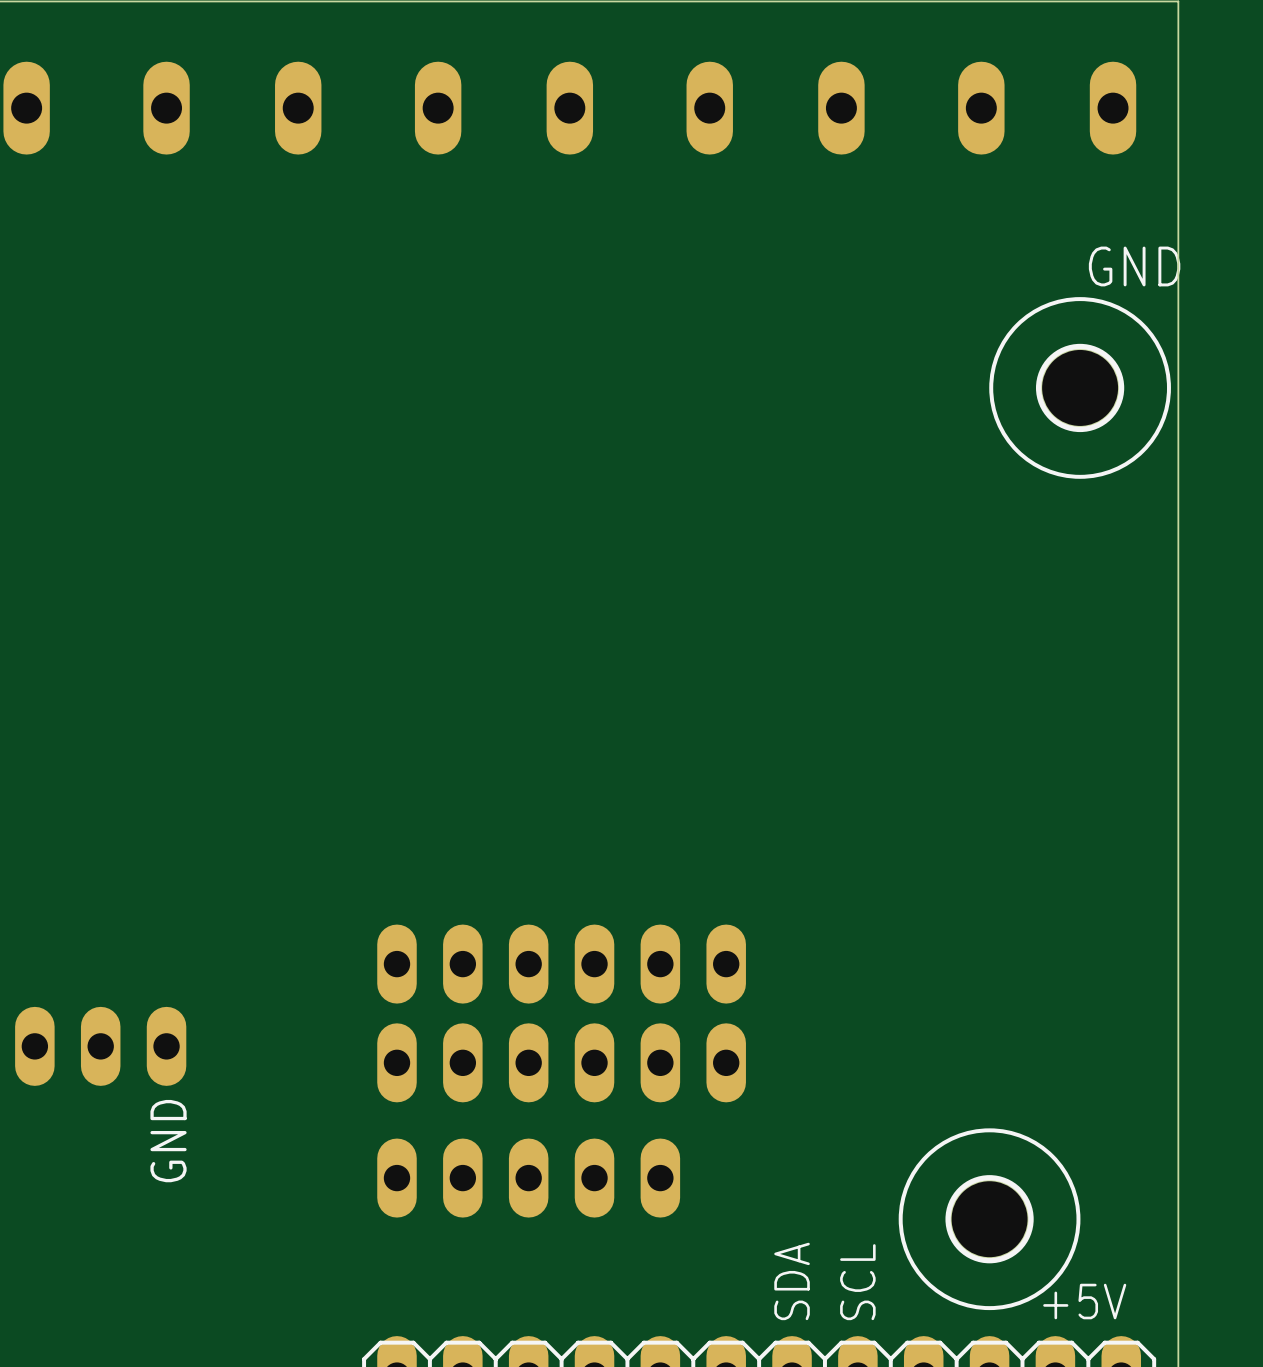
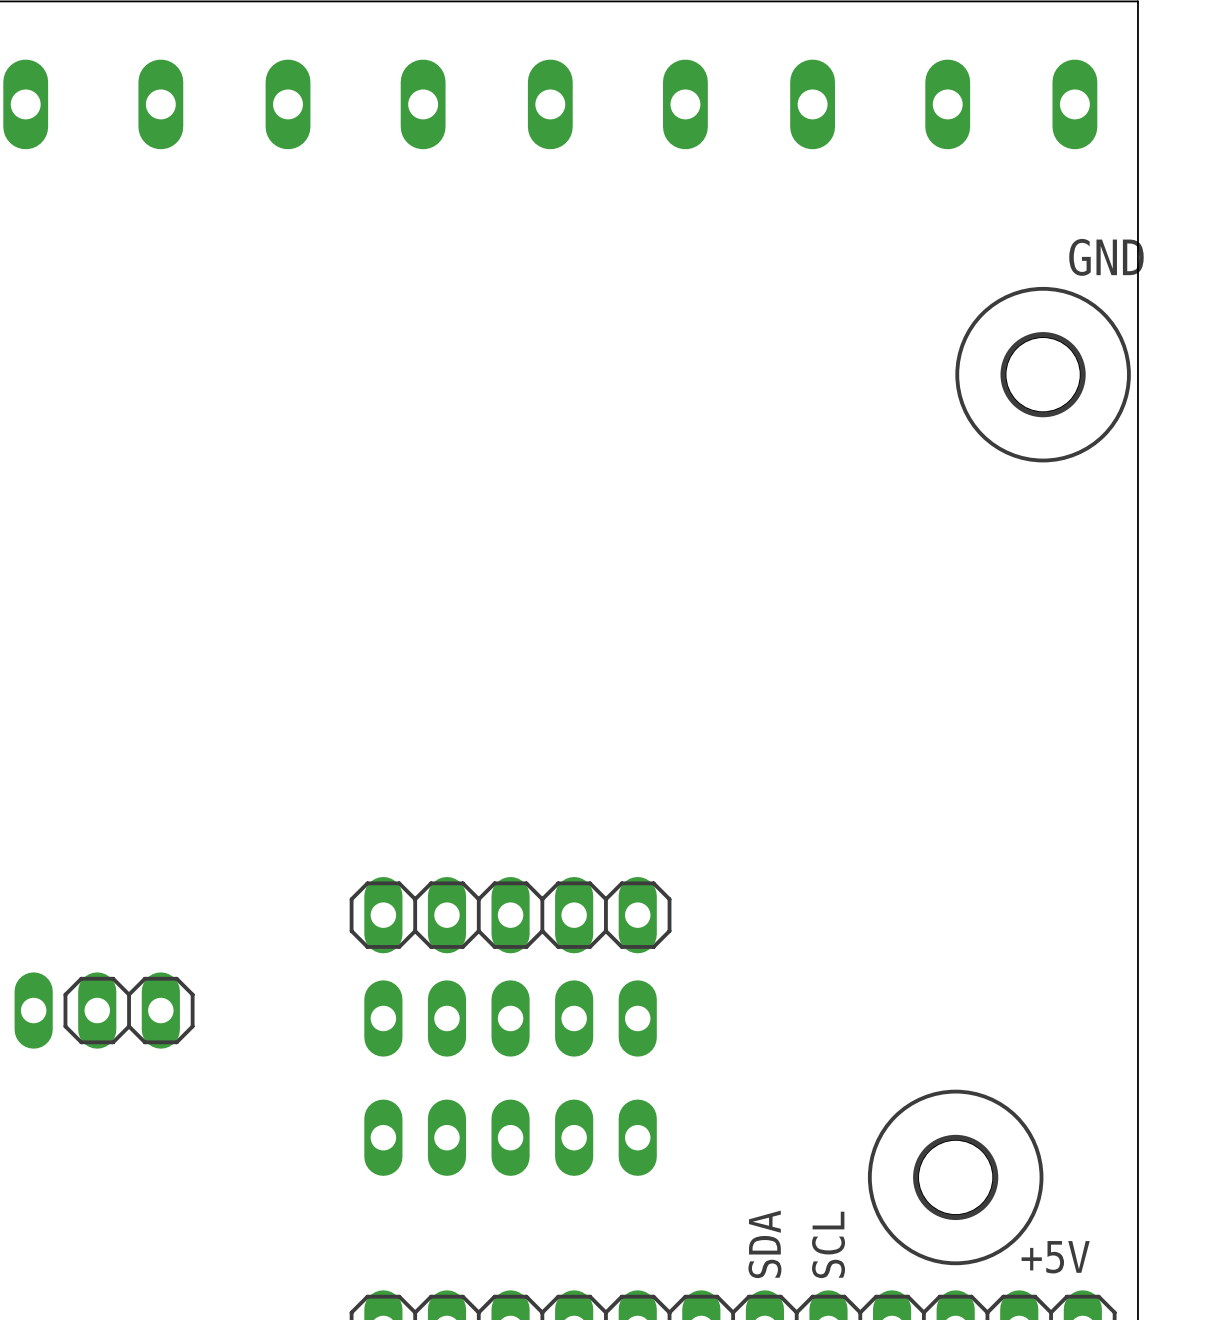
part: none -> (510, 915)
part: (561, 964) -> none
GND side: bottom (133, 1046) -> top (129, 1010)
part: none -> (510, 1018)
part: (561, 1062) -> none

